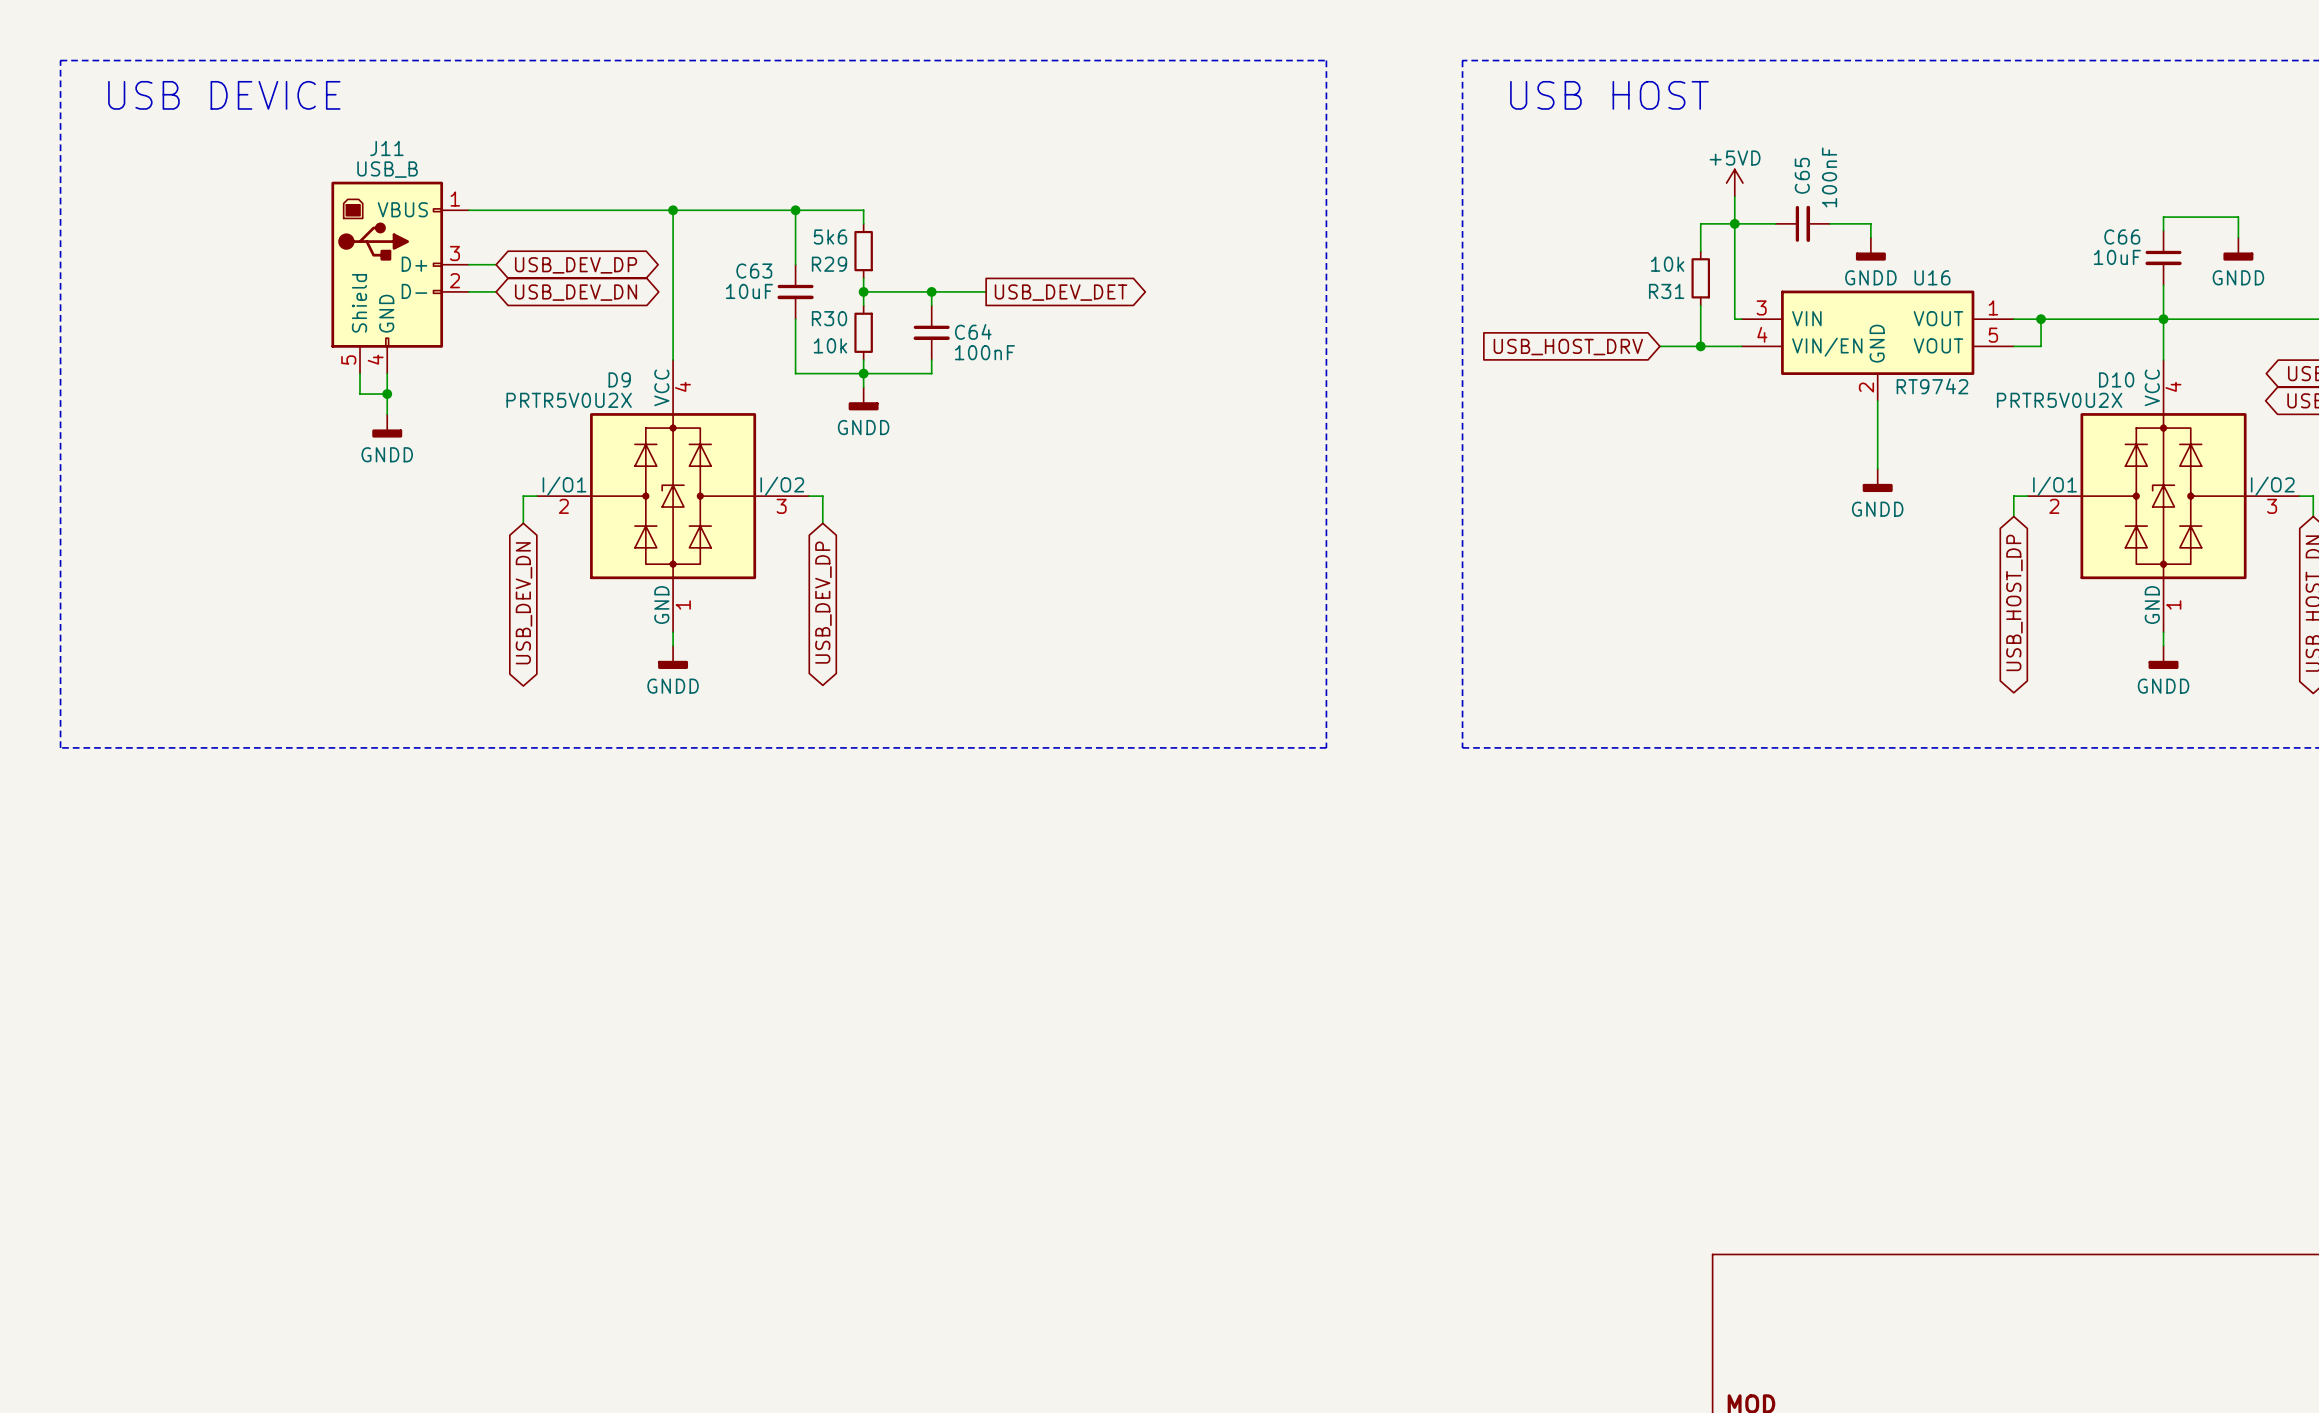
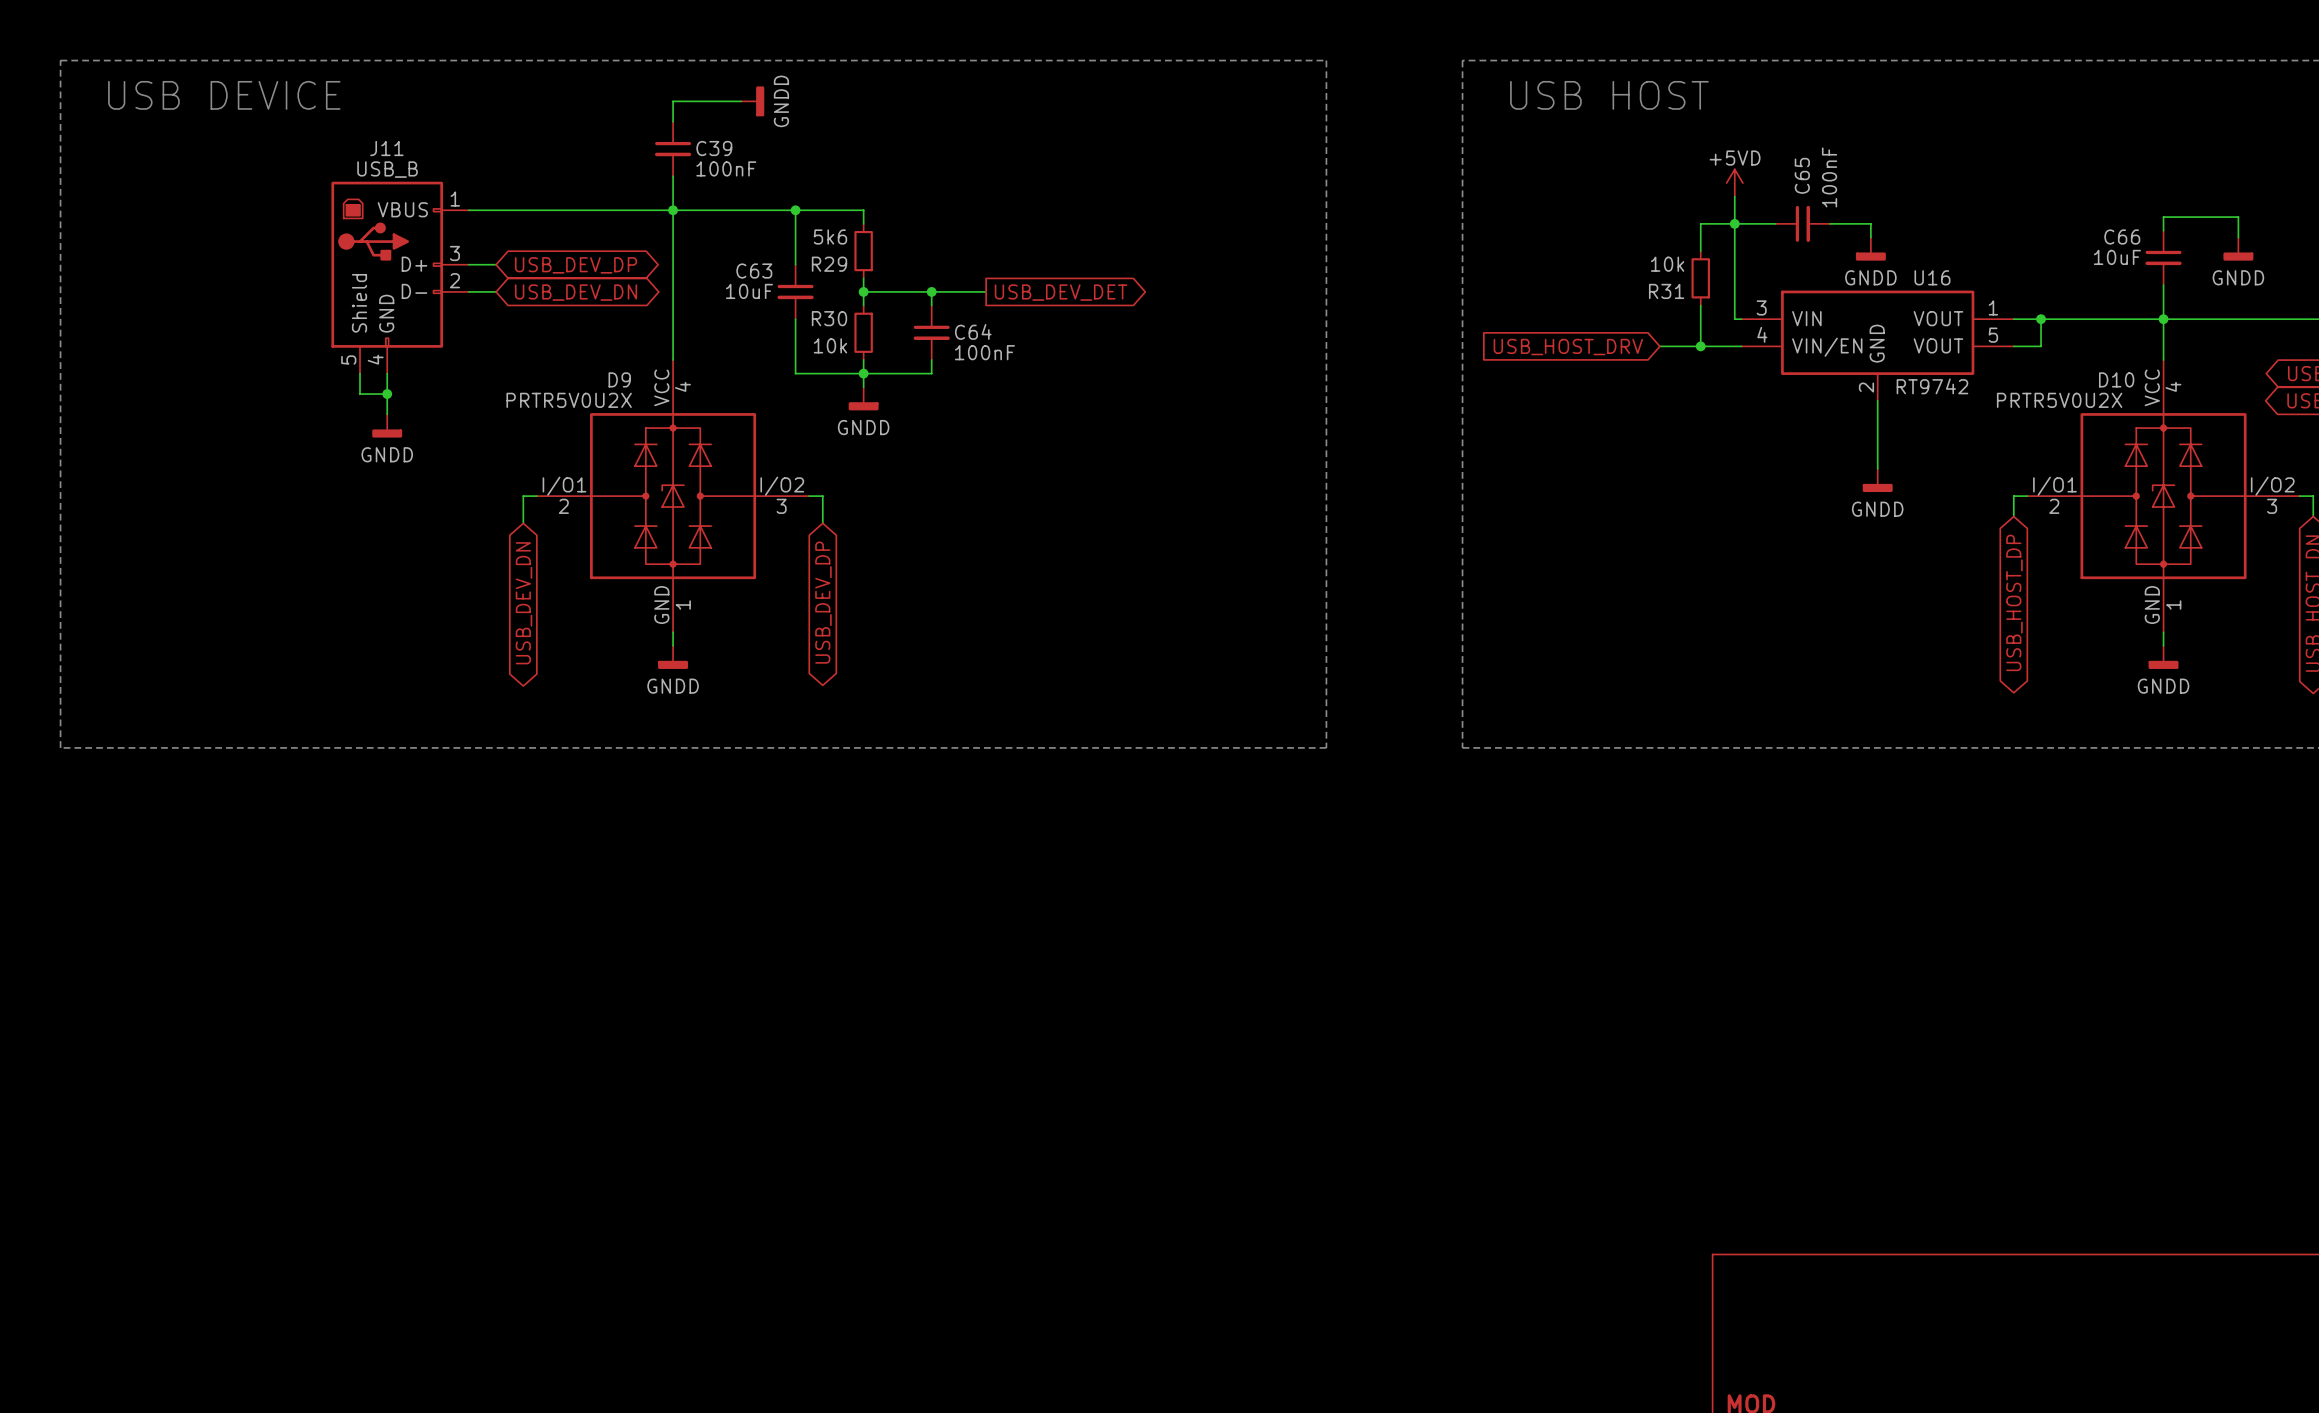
wire: none -> (741, 101) (673, 101) (673, 121)
power symbol: none -> GNDD (752, 101)
C39: none -> 100nF (673, 149)
wire: none -> (673, 176) (673, 210)

